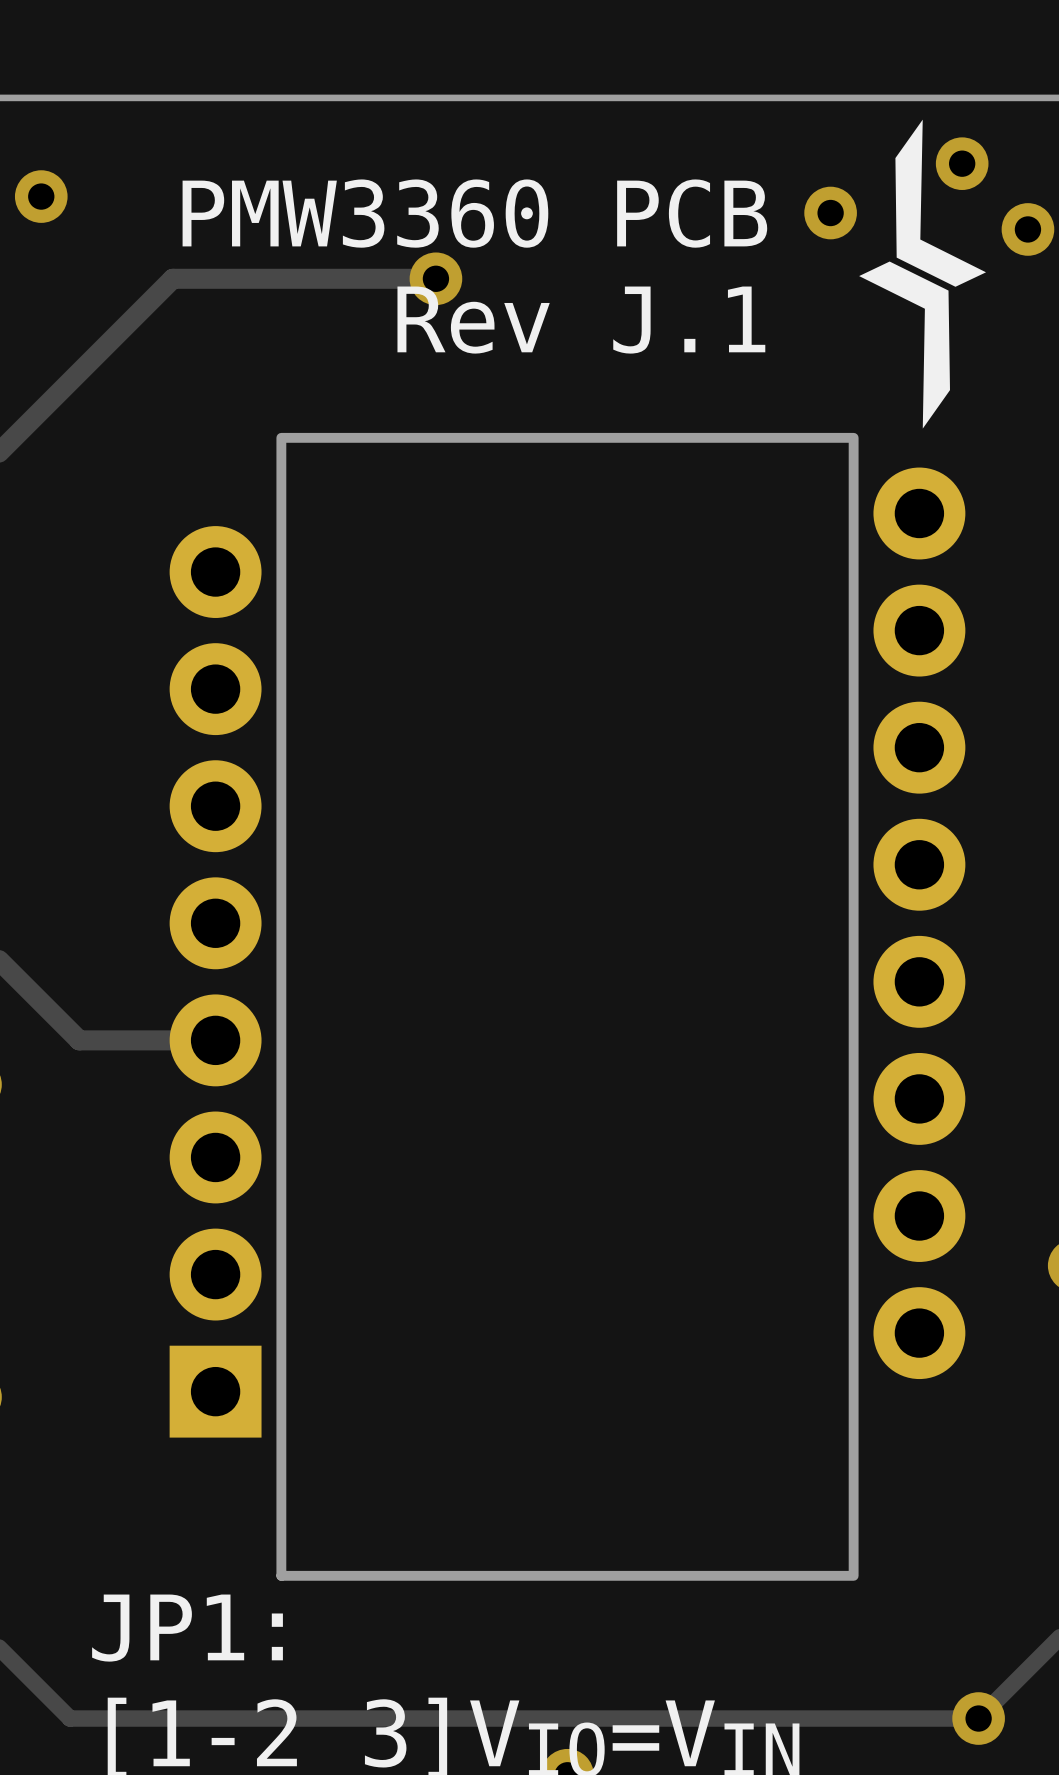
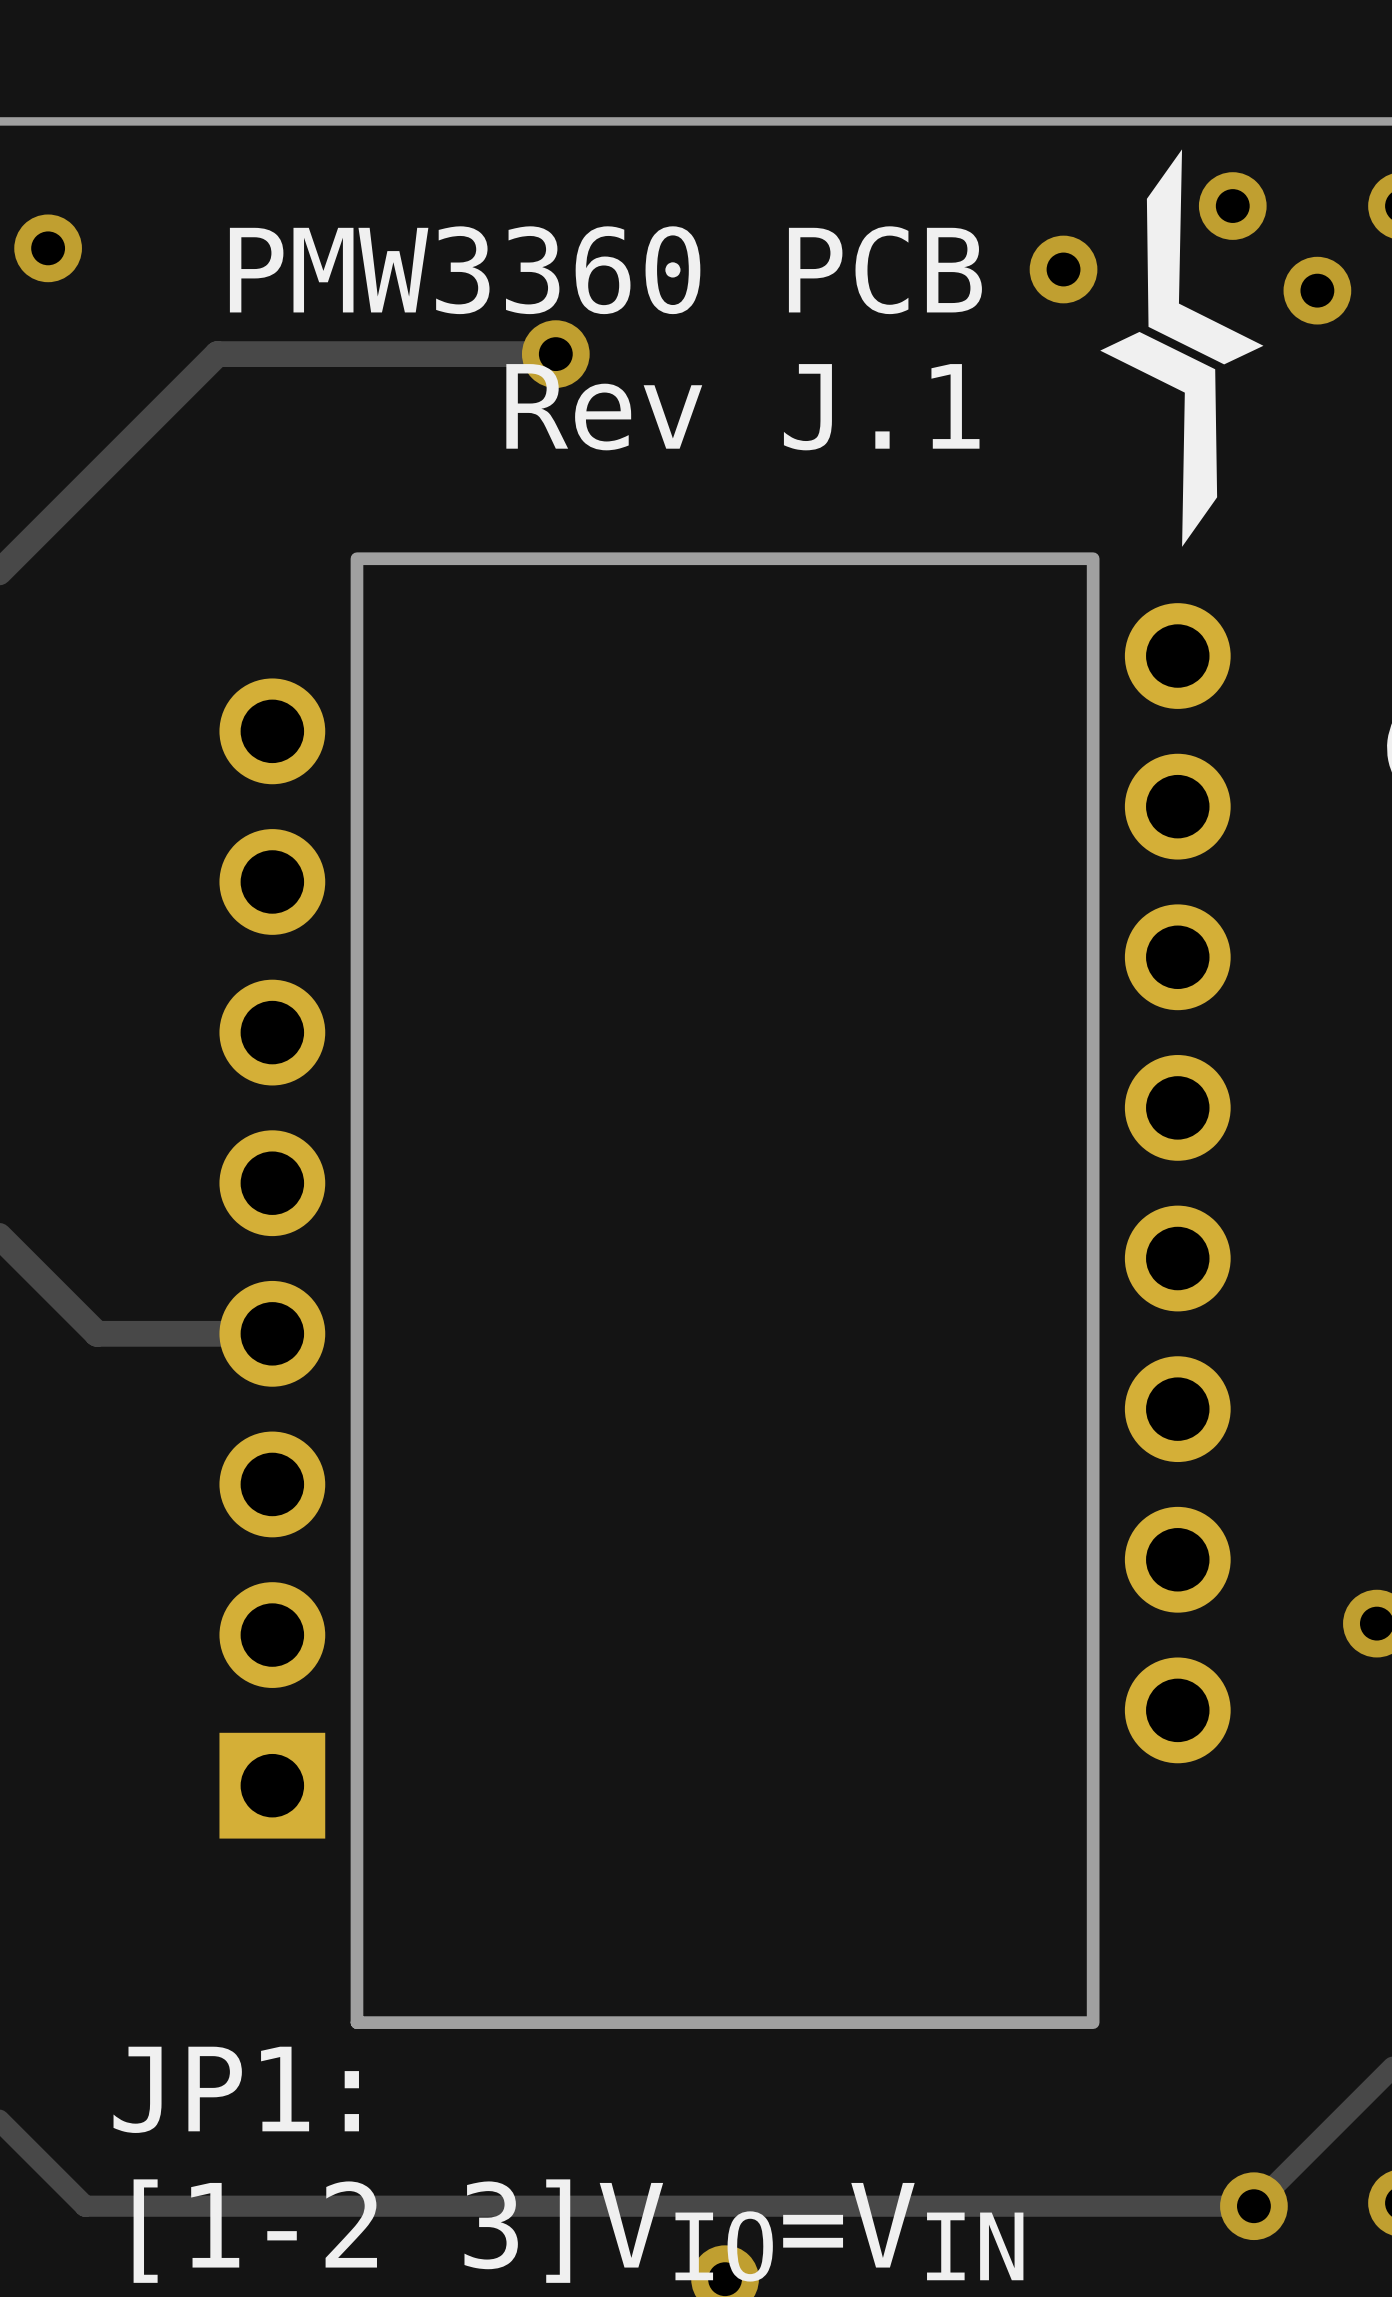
part footprint: [169, 432, 966, 1581] -> [219, 552, 1231, 2029]

